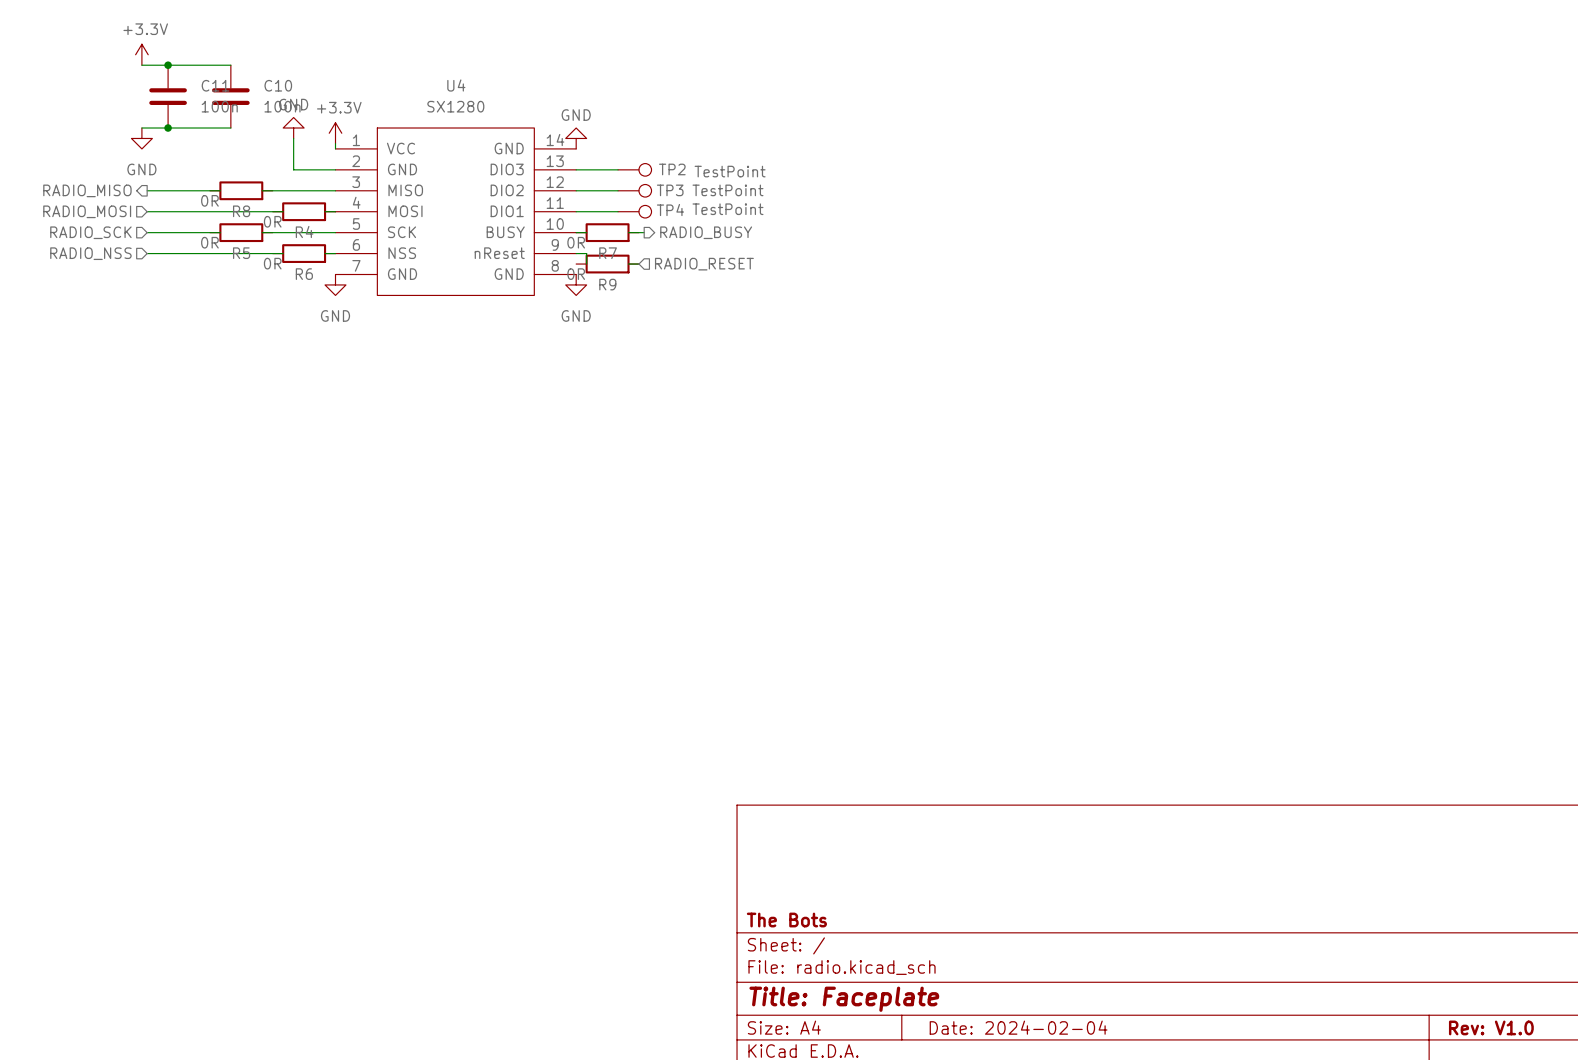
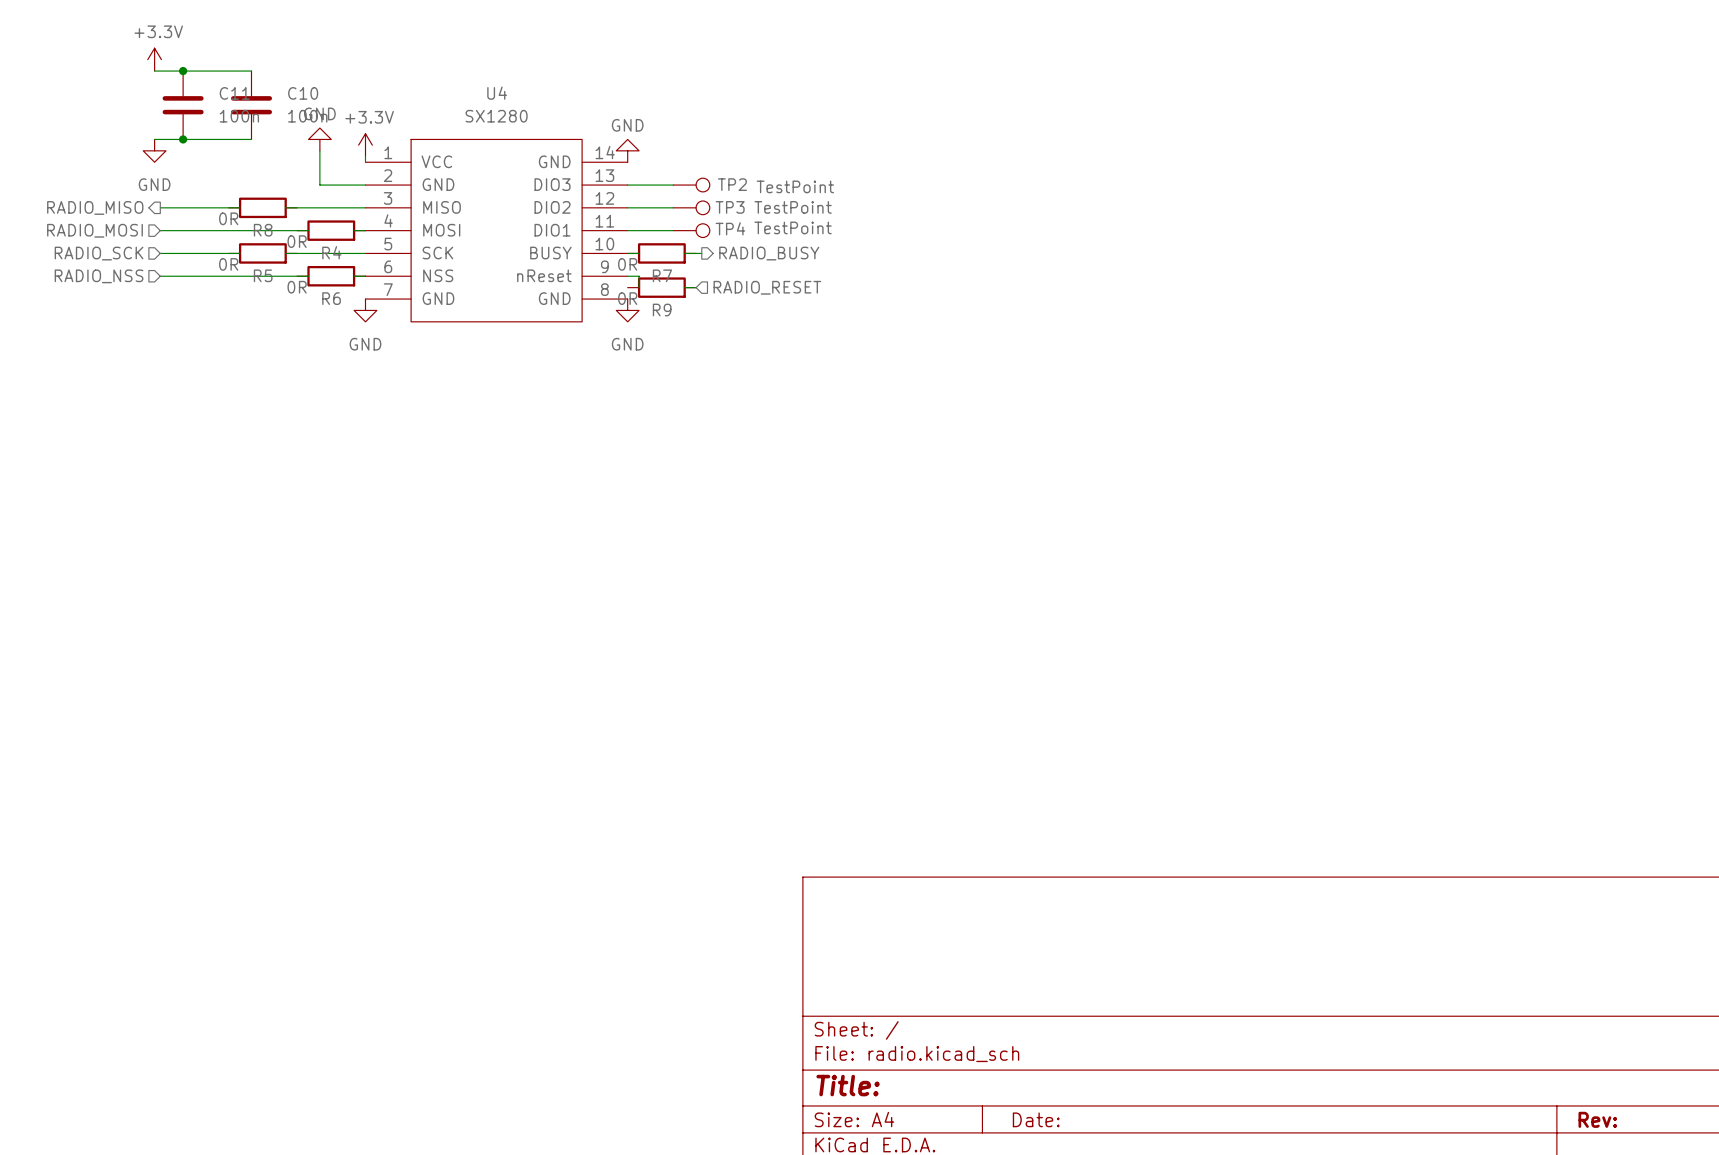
title block: The Bots (786, 920) -> none
title block: Title: Faceplate (844, 999) -> Title: (848, 1085)
title block: Date: 2024-02-04 (1018, 1027) -> Date: (1036, 1119)
title block: Rev: V1.0 (1491, 1027) -> Rev: (1597, 1119)

